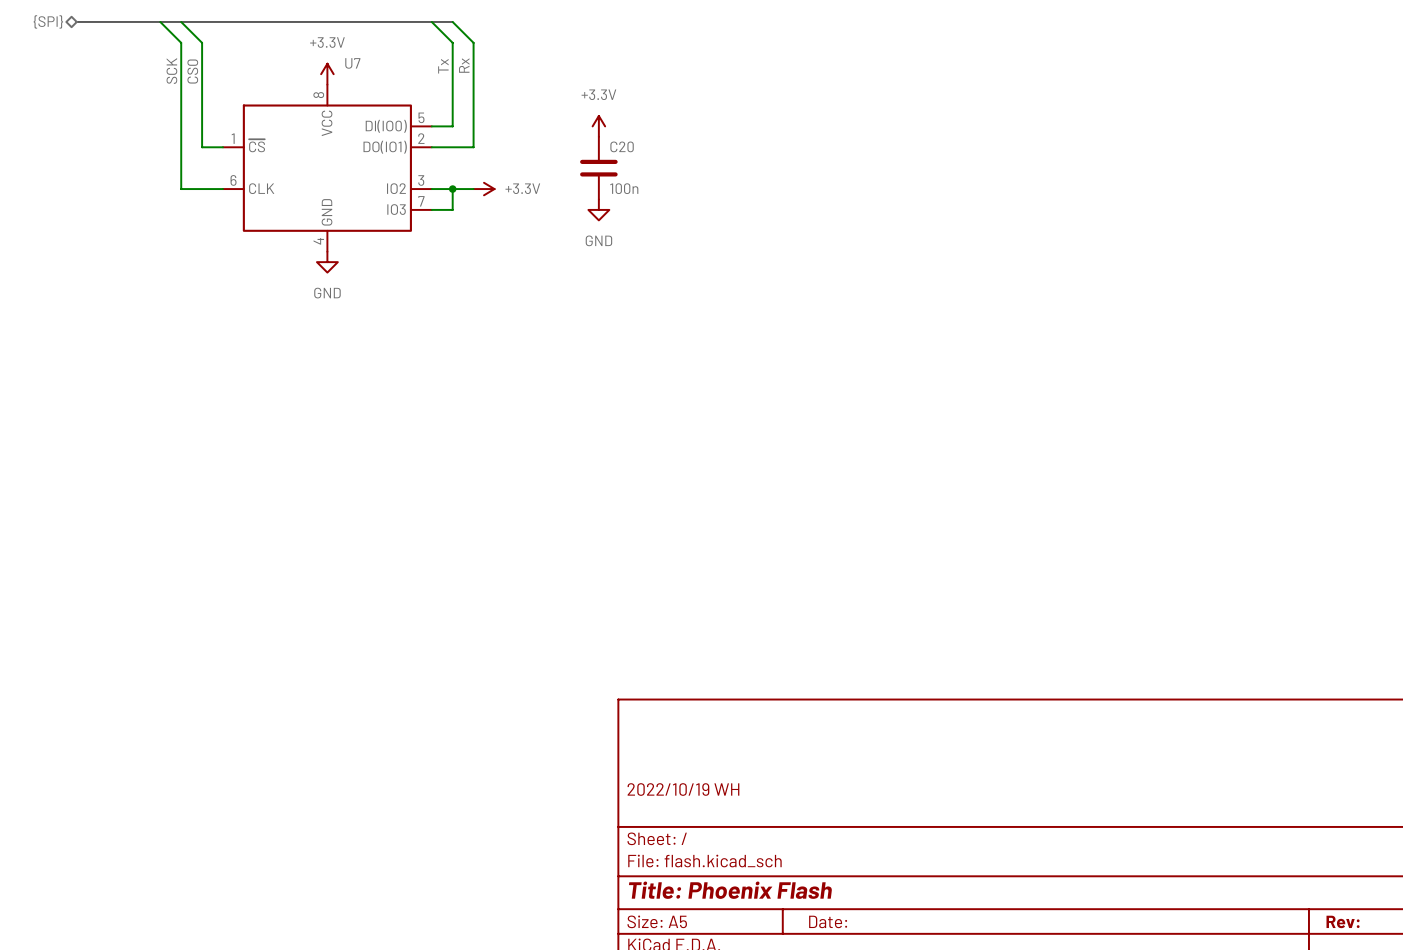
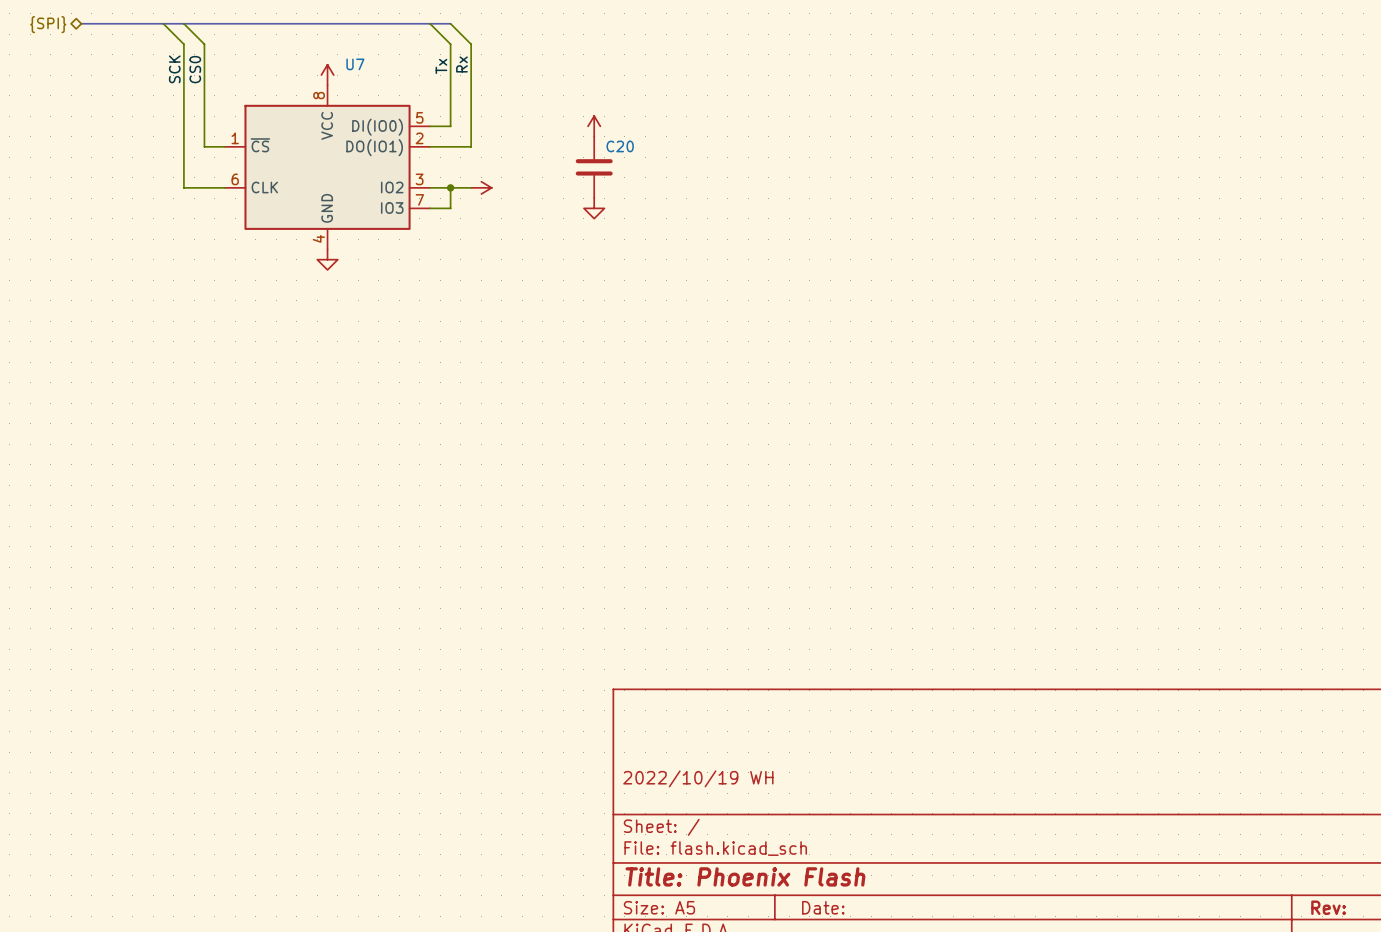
power symbol text: +3.3V (327, 42) -> none
power symbol text: +3.3V (598, 94) -> none
power symbol text: +3.3V (522, 188) -> none
C20 value: 100n (624, 188) -> none
power symbol text: GND (598, 240) -> none
power symbol text: GND (327, 293) -> none

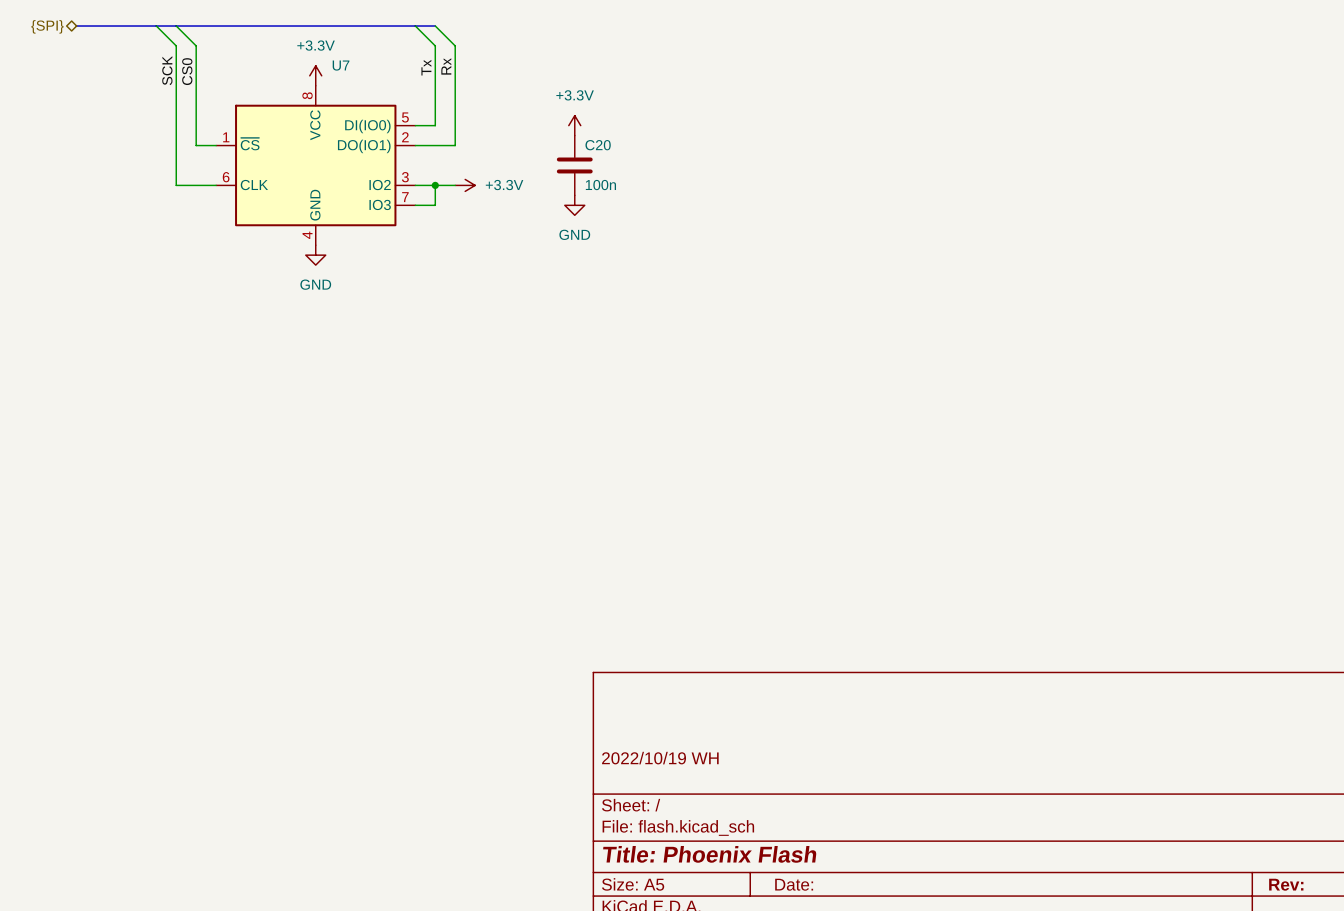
power symbol text: none -> +3.3V (316, 45)
power symbol text: none -> +3.3V (575, 95)
power symbol text: none -> +3.3V (504, 185)
C20 value: none -> 100n (600, 185)
power symbol text: none -> GND (574, 234)
power symbol text: none -> GND (315, 284)

